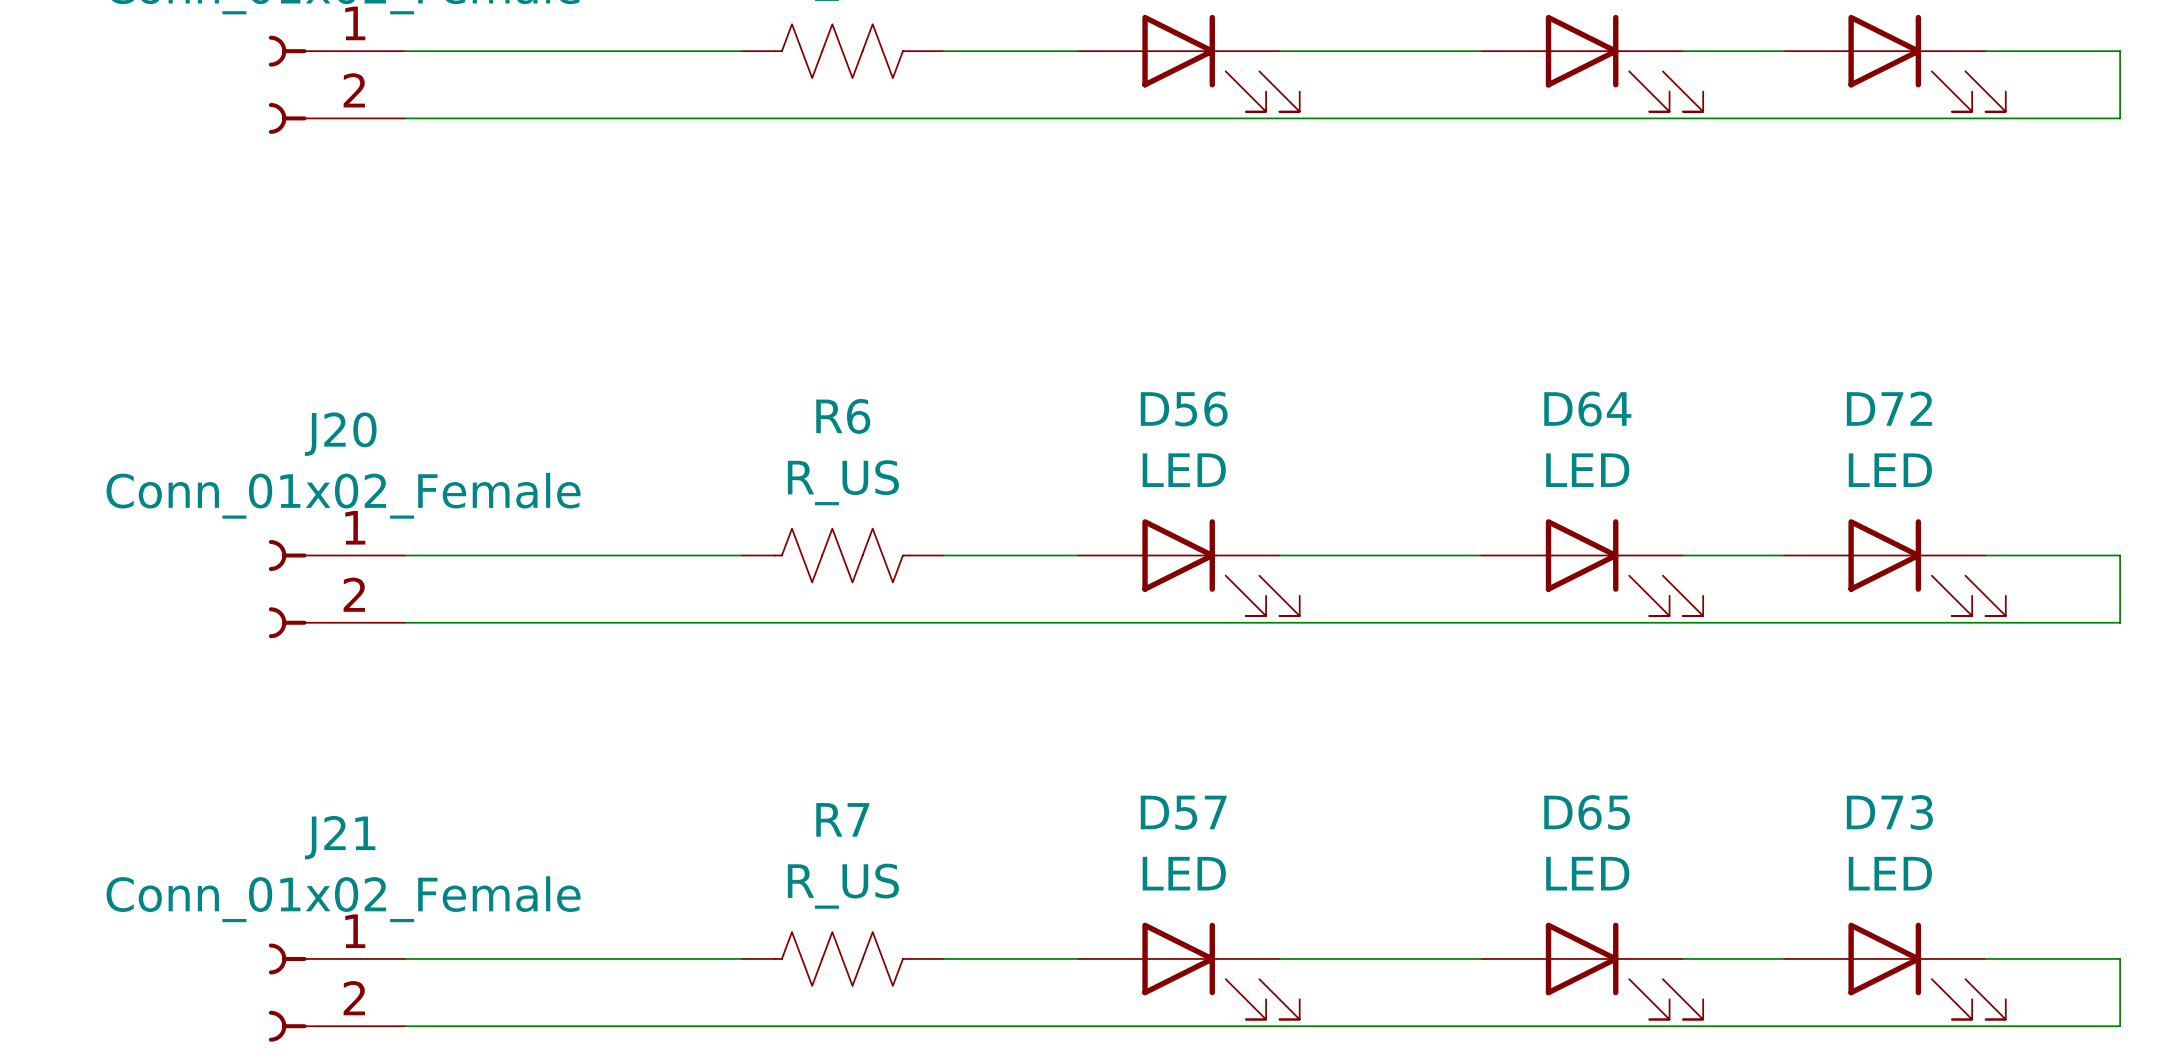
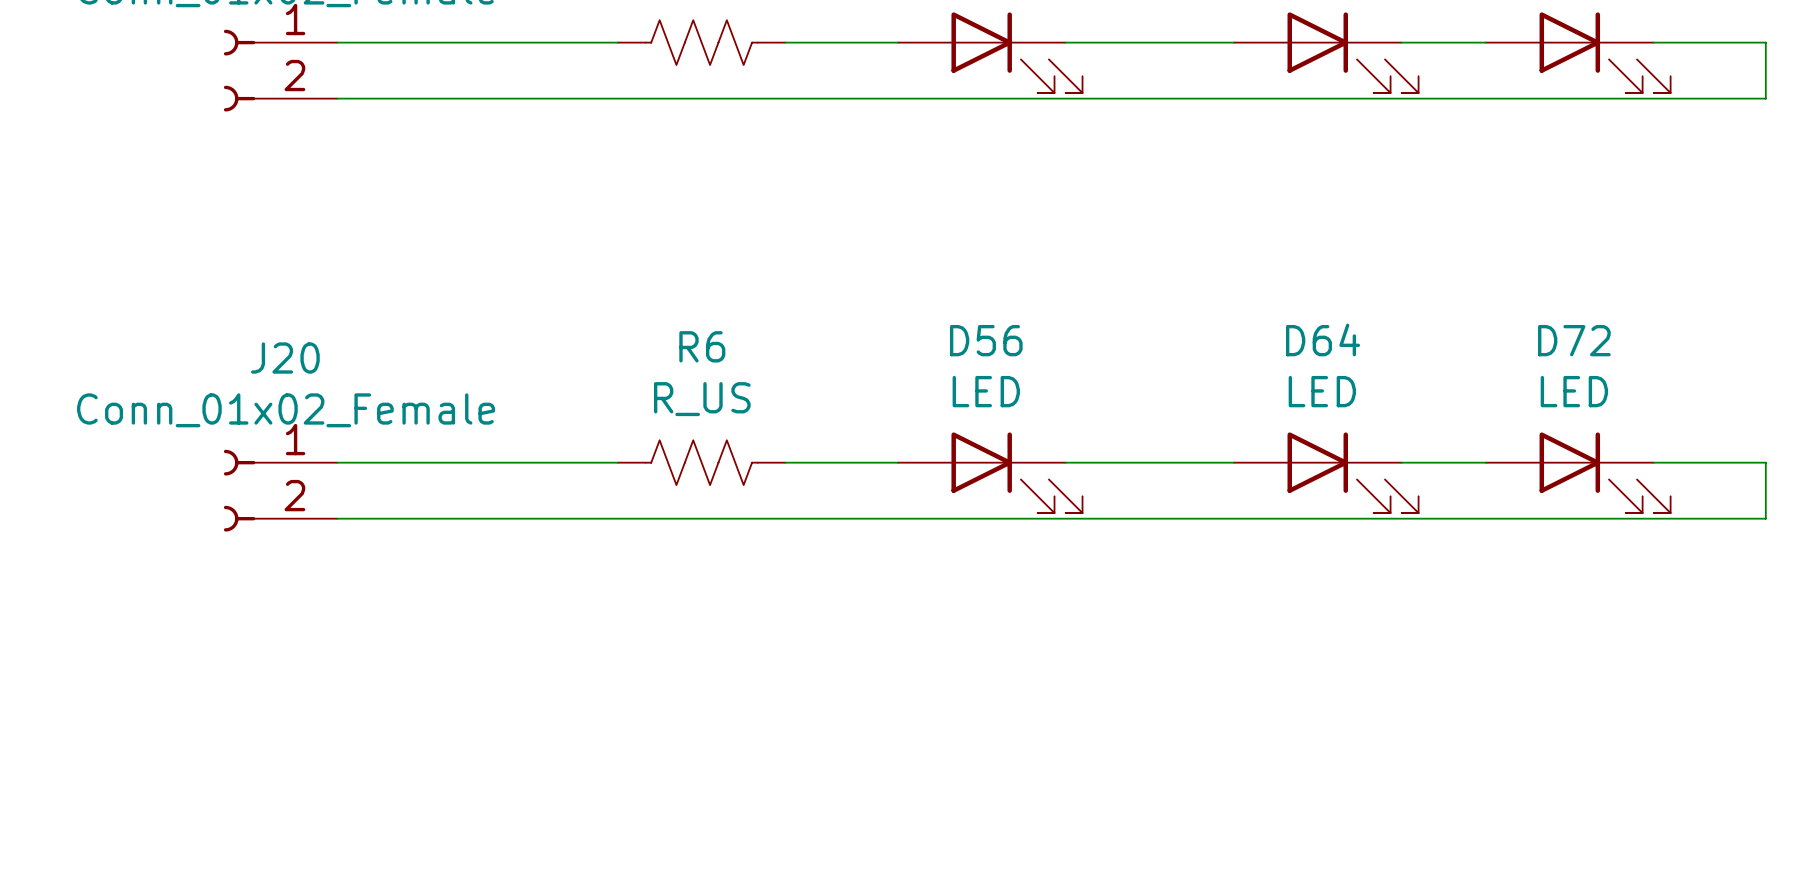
wire: (405, 958) (741, 958) -> none
R7: R_US (842, 958) -> none
wire: (943, 958) (1077, 958) -> none
wire: (1279, 958) (1481, 958) -> none
wire: (1683, 958) (1783, 958) -> none
wire: (1985, 958) (2120, 958) (2120, 1026) (405, 1026) -> none
D57: LED (1188, 971) -> none
D65: LED (1592, 971) -> none
D73: LED (1894, 971) -> none
J21: Conn_01x02_Female (337, 992) -> none

